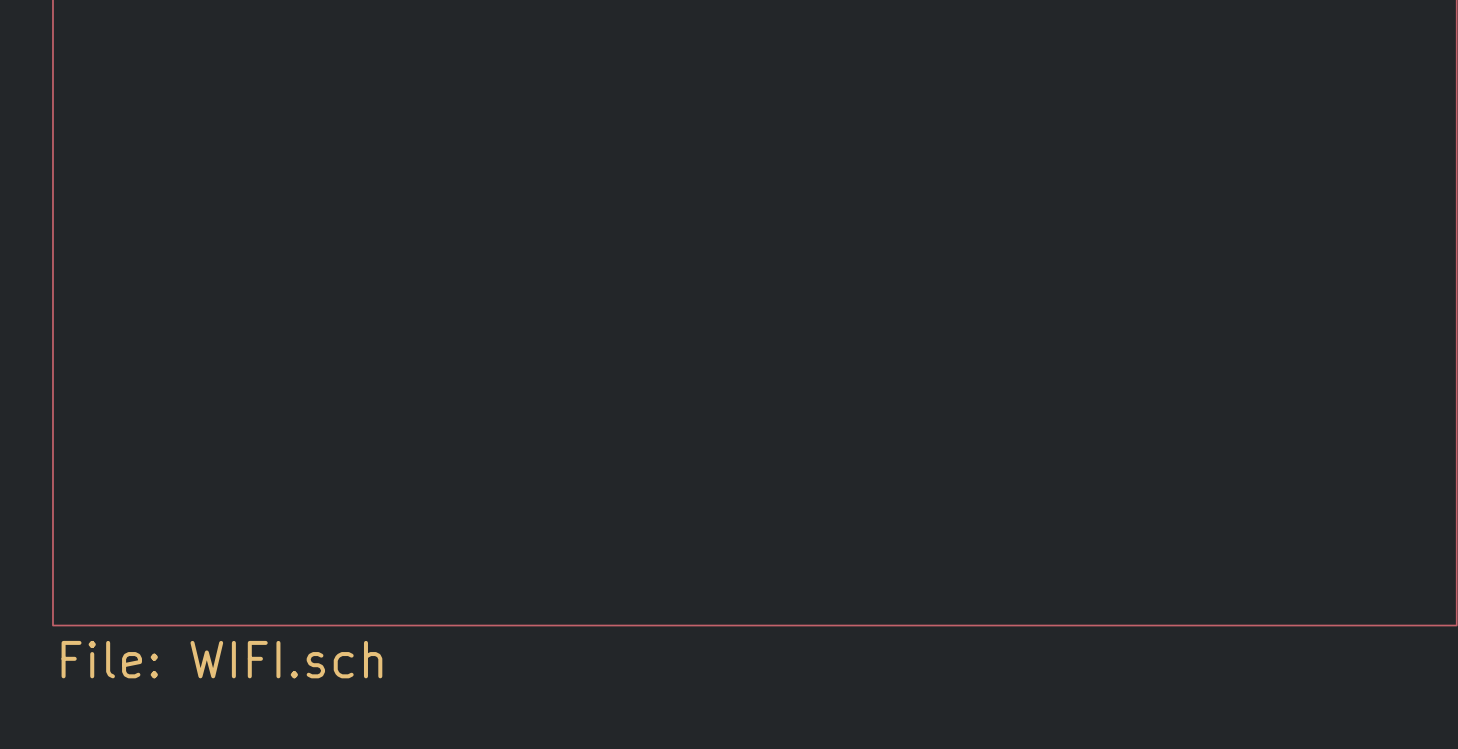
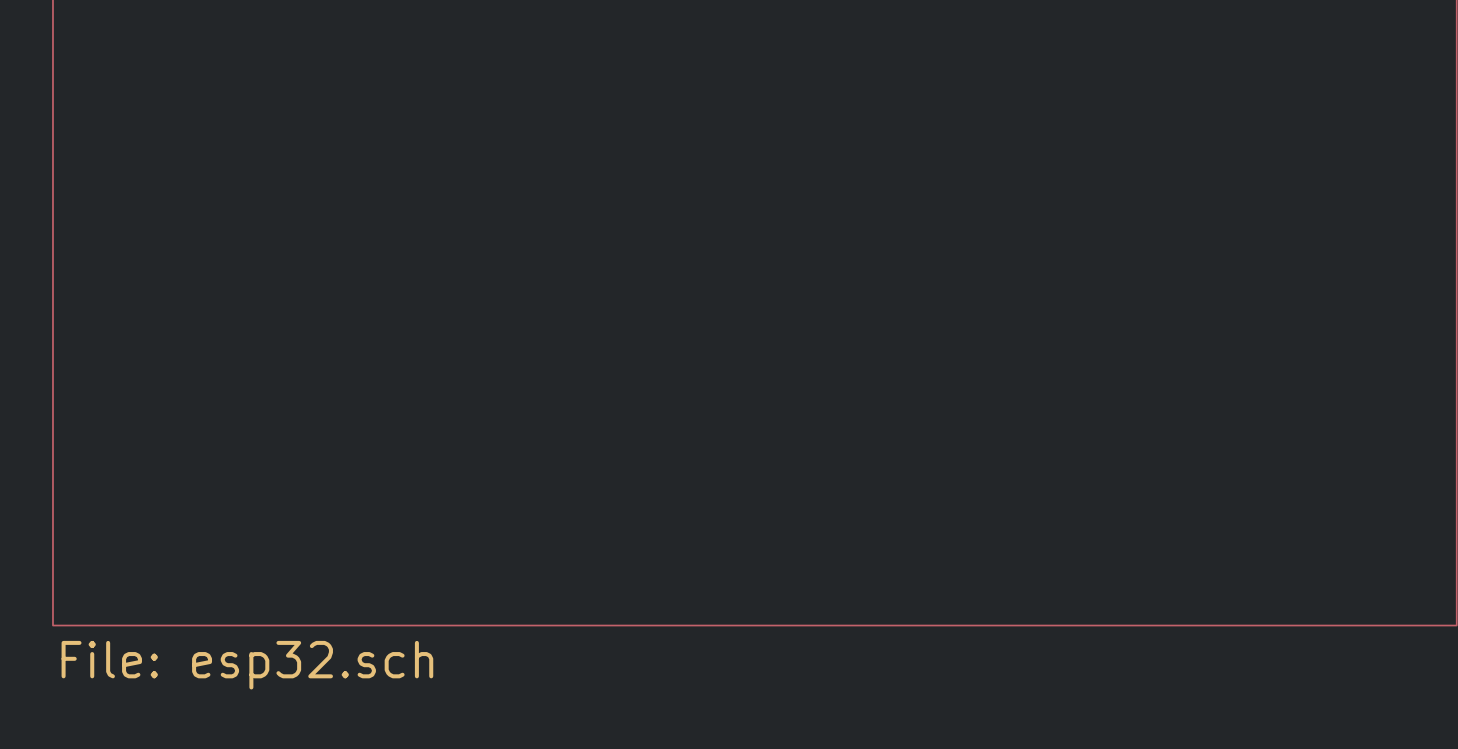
sheet value: File: WIFI.sch (221, 659) -> File: esp32.sch (247, 665)

